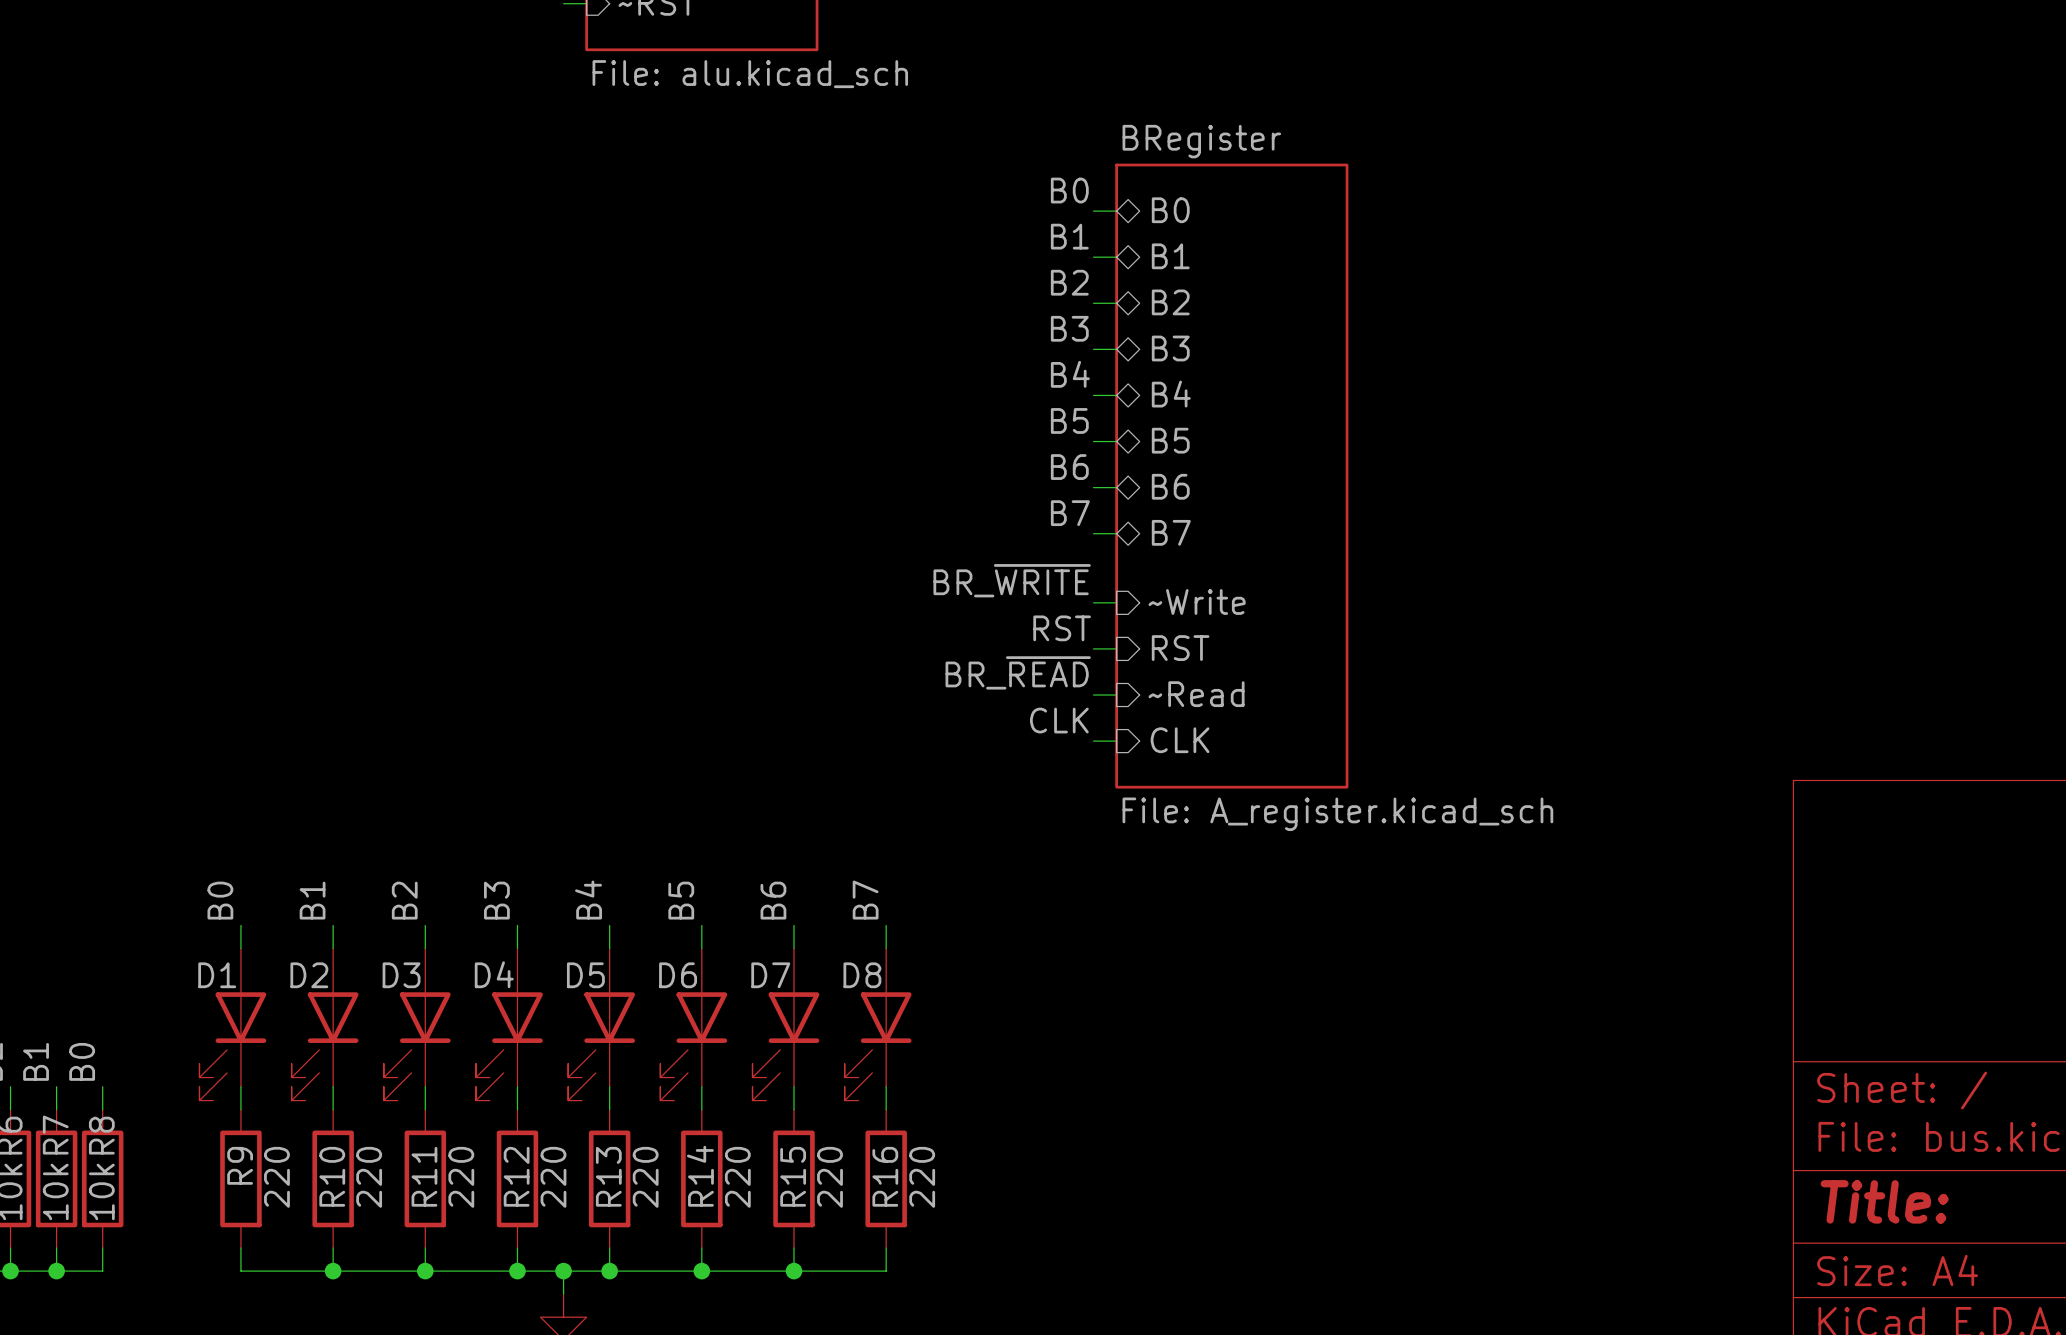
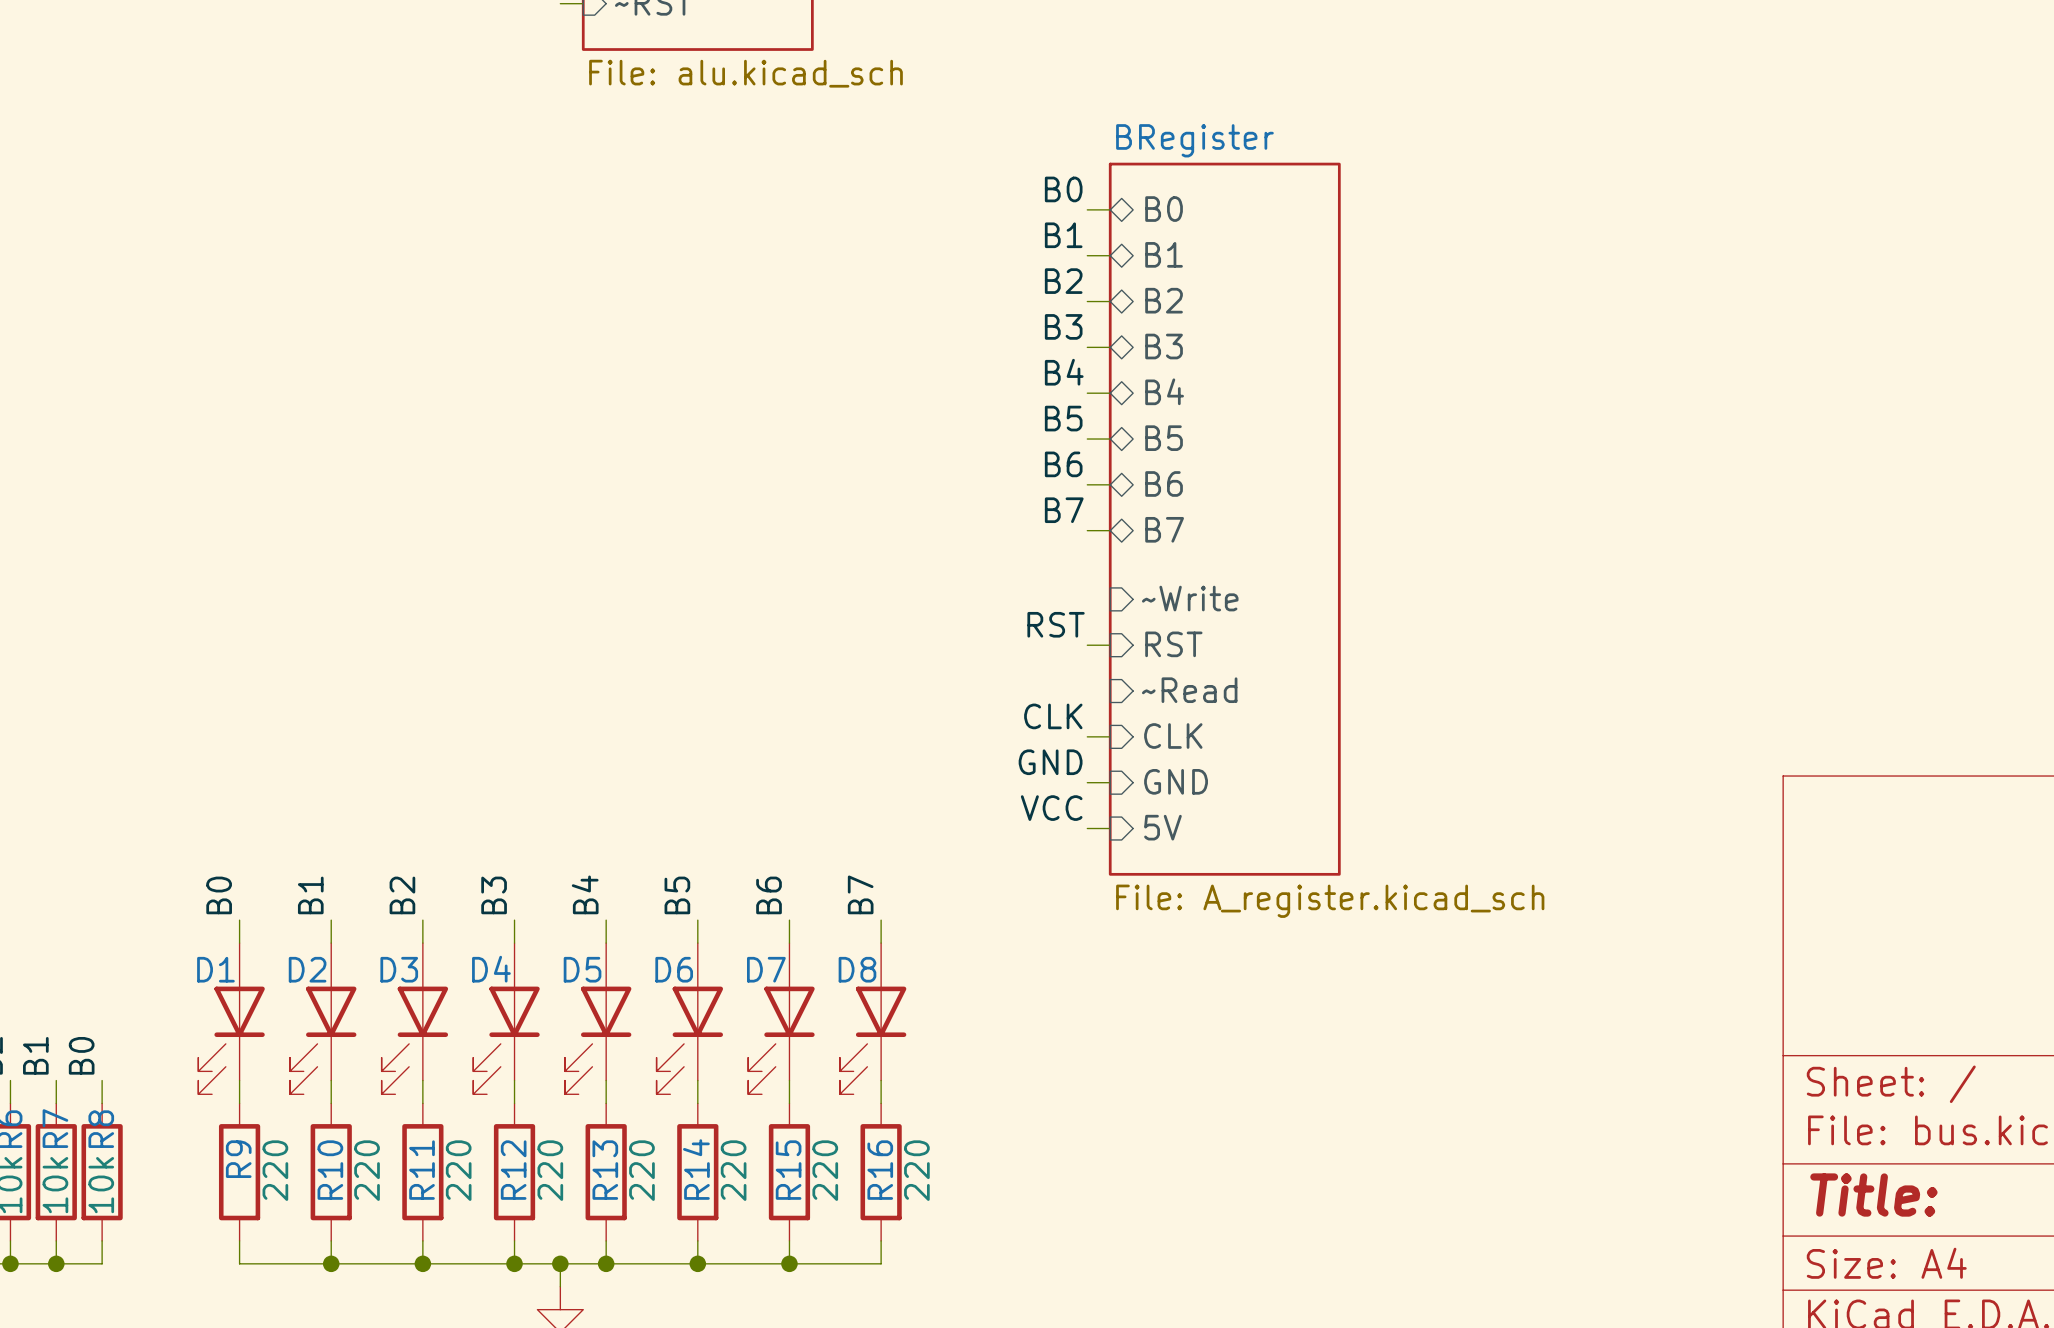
sheet BRegister: File: A_register.kicad_sch (1231, 476) -> none
sheet BRegister: none -> File: A_register.kicad_sch (1224, 519)
label: BR_~{WRITE} (1012, 580) -> none
wire: (1093, 602) (1116, 602) -> (1087, 828) (1110, 828)
label: BR_~{READ} (1018, 672) -> none
wire: (1093, 695) (1116, 695) -> (1087, 782) (1110, 782)
label: none -> GND (1050, 762)
sheet pin: none -> GND (1176, 781)
label: none -> VCC (1051, 808)
sheet pin: none -> 5V (1162, 827)

